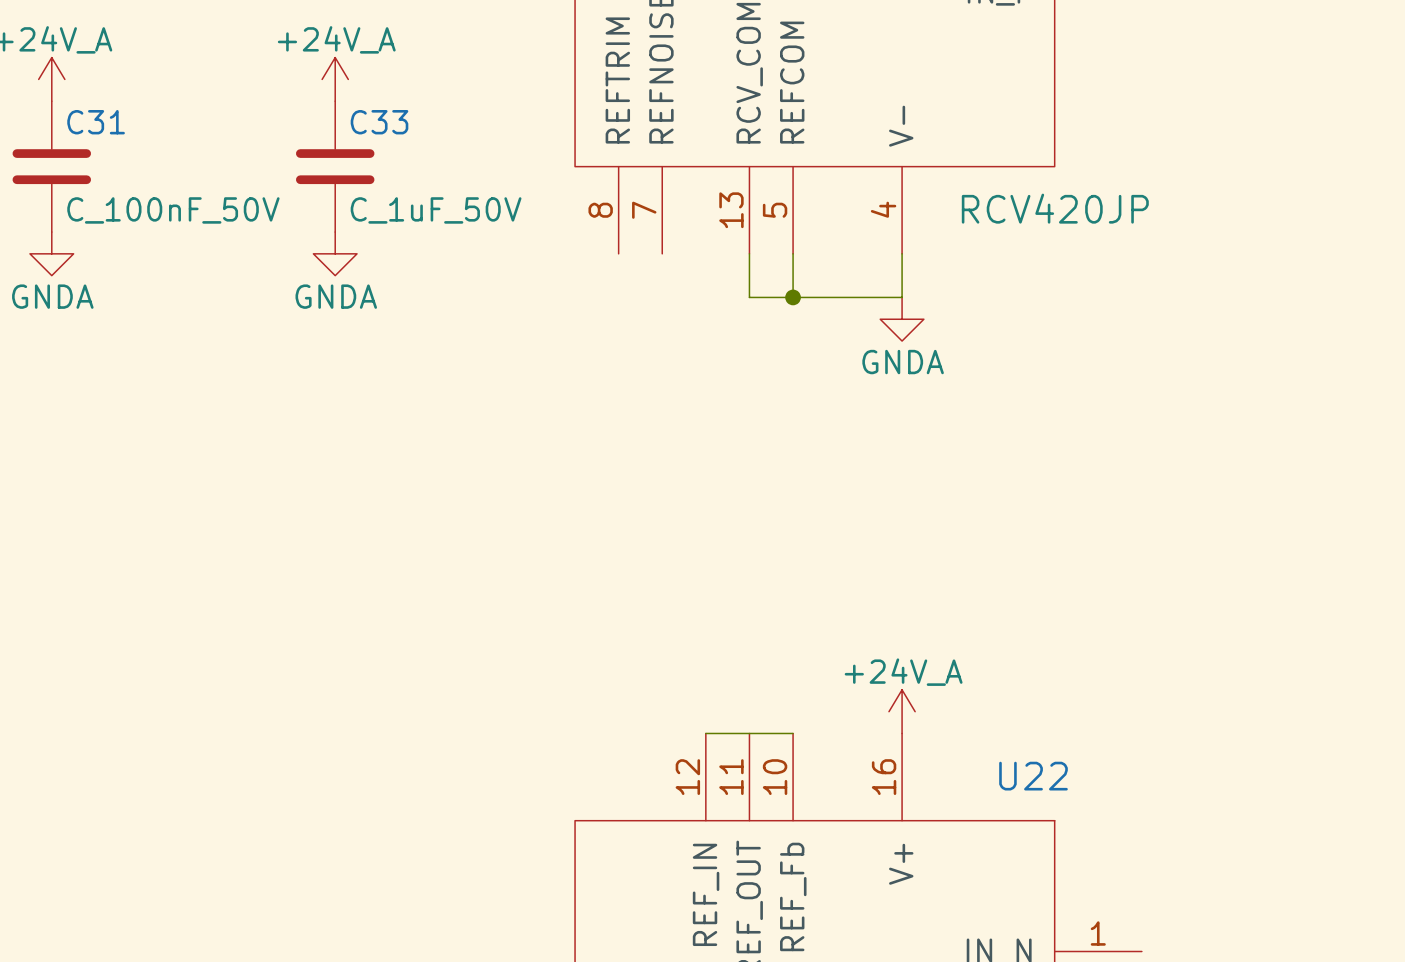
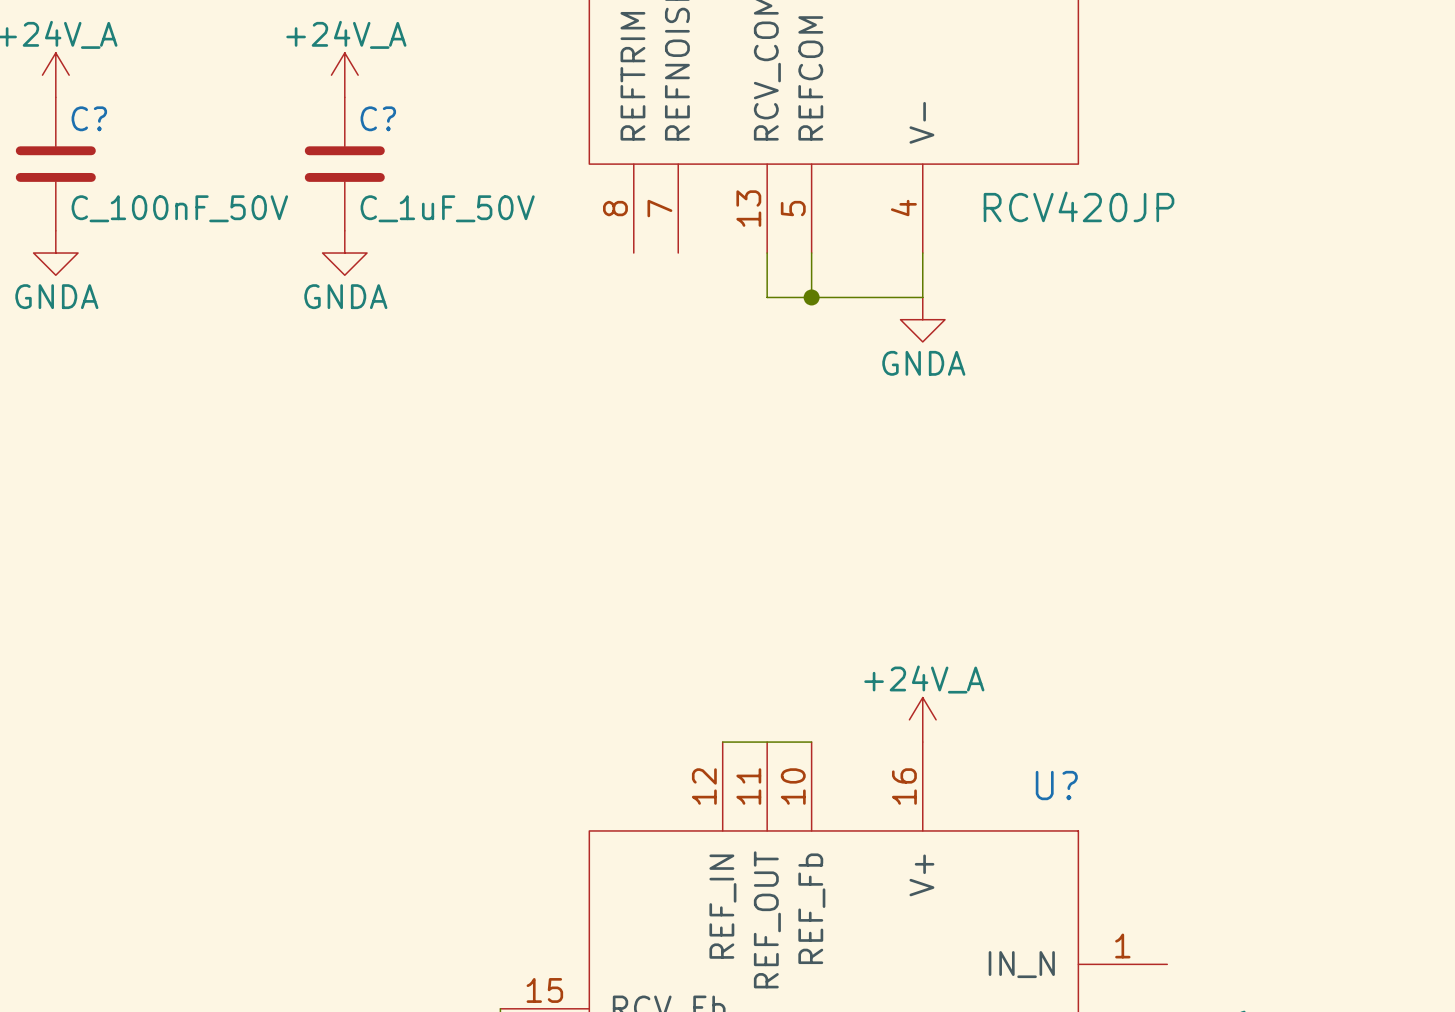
C31 name: C31 (96, 122) -> C? (89, 118)
C33 name: C33 (379, 122) -> C? (378, 118)
U22 name: U22 (1033, 776) -> U? (1056, 785)

